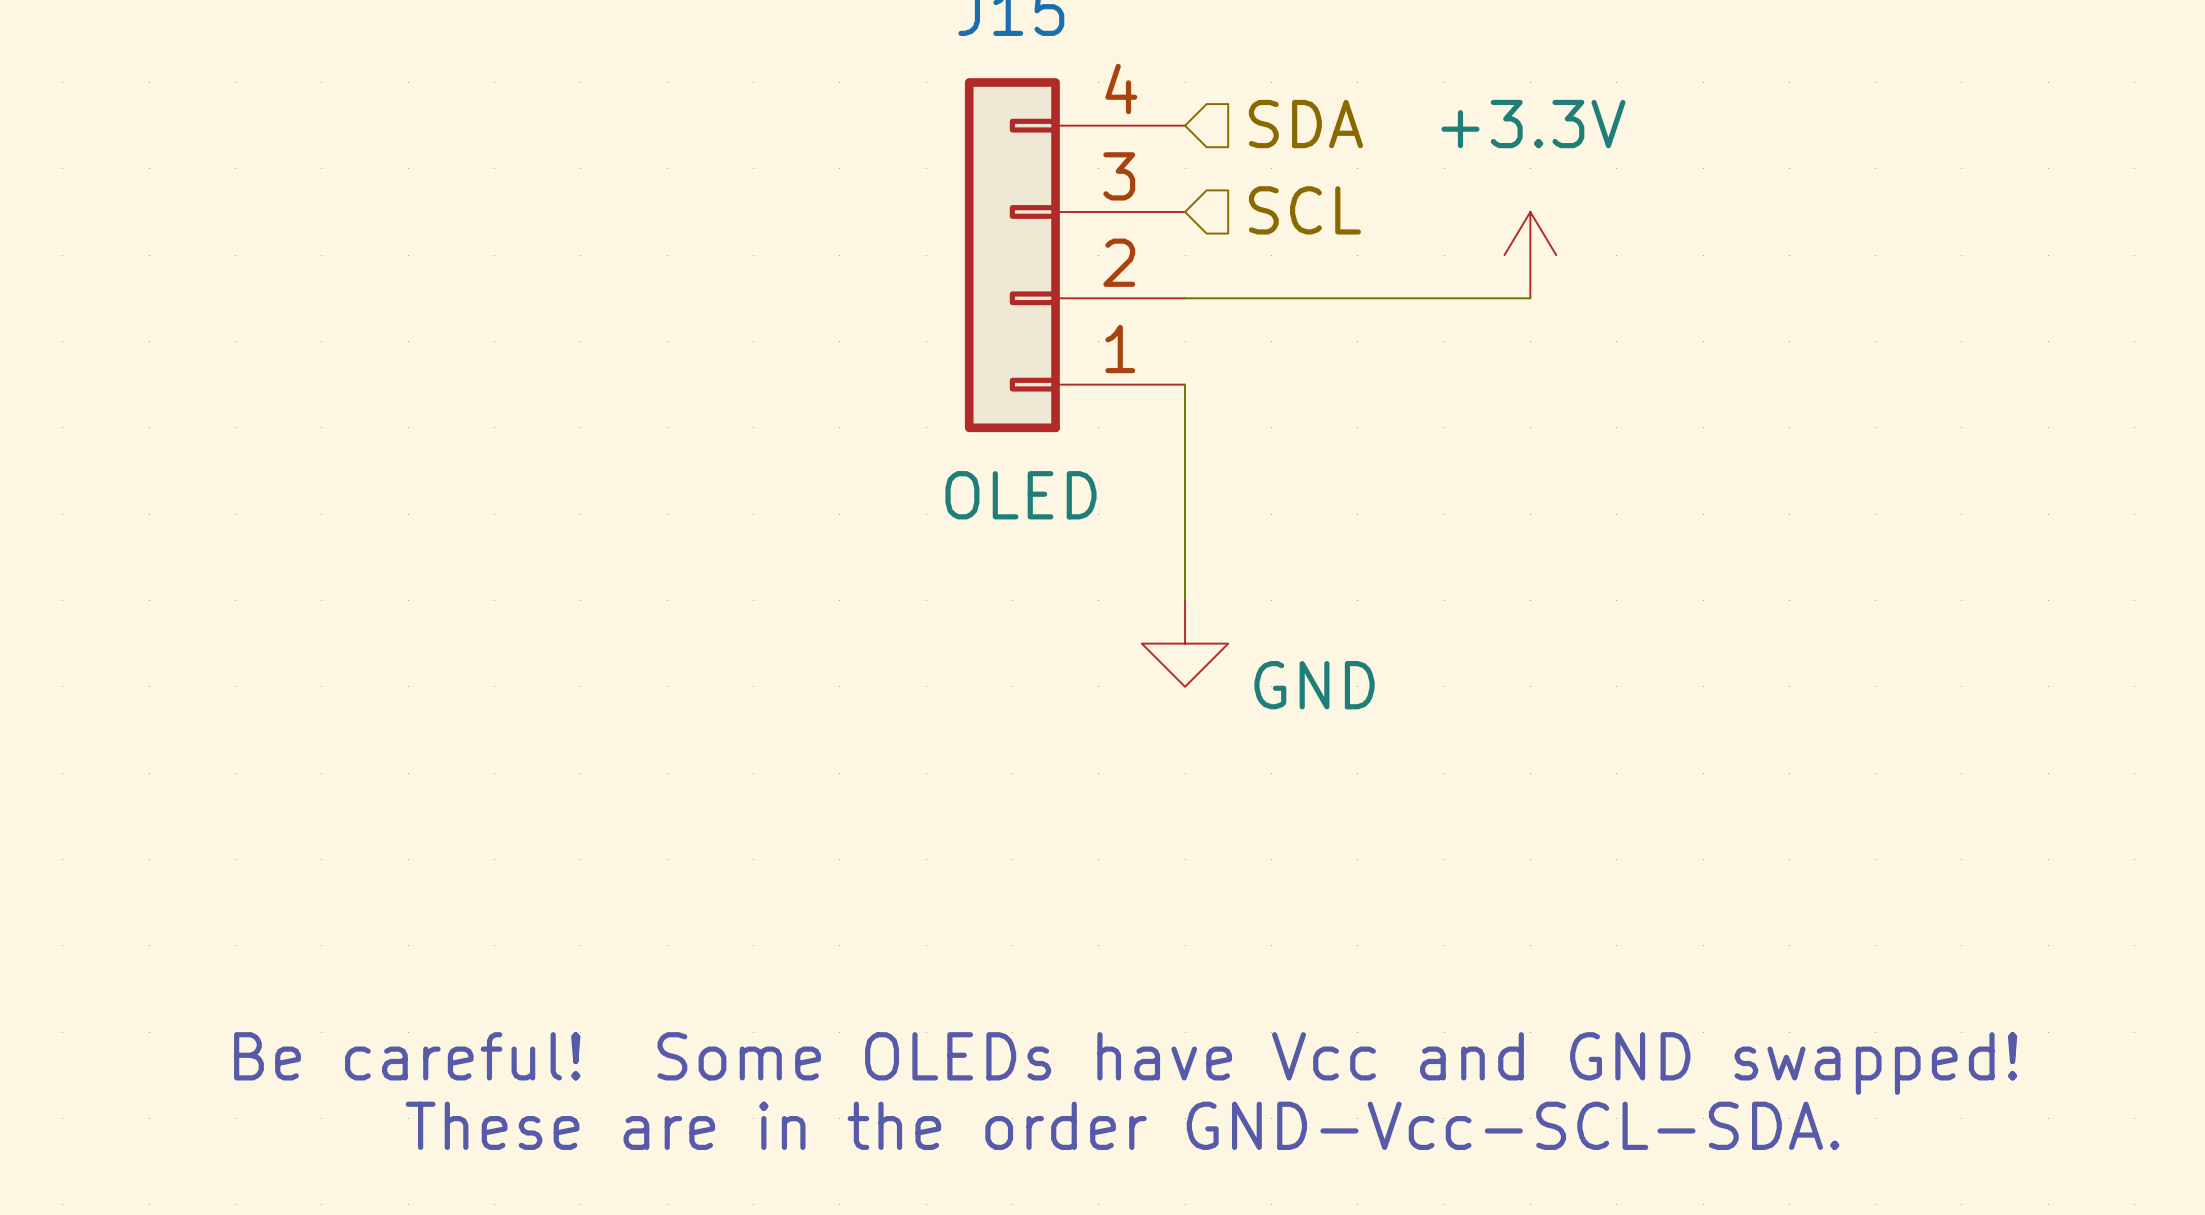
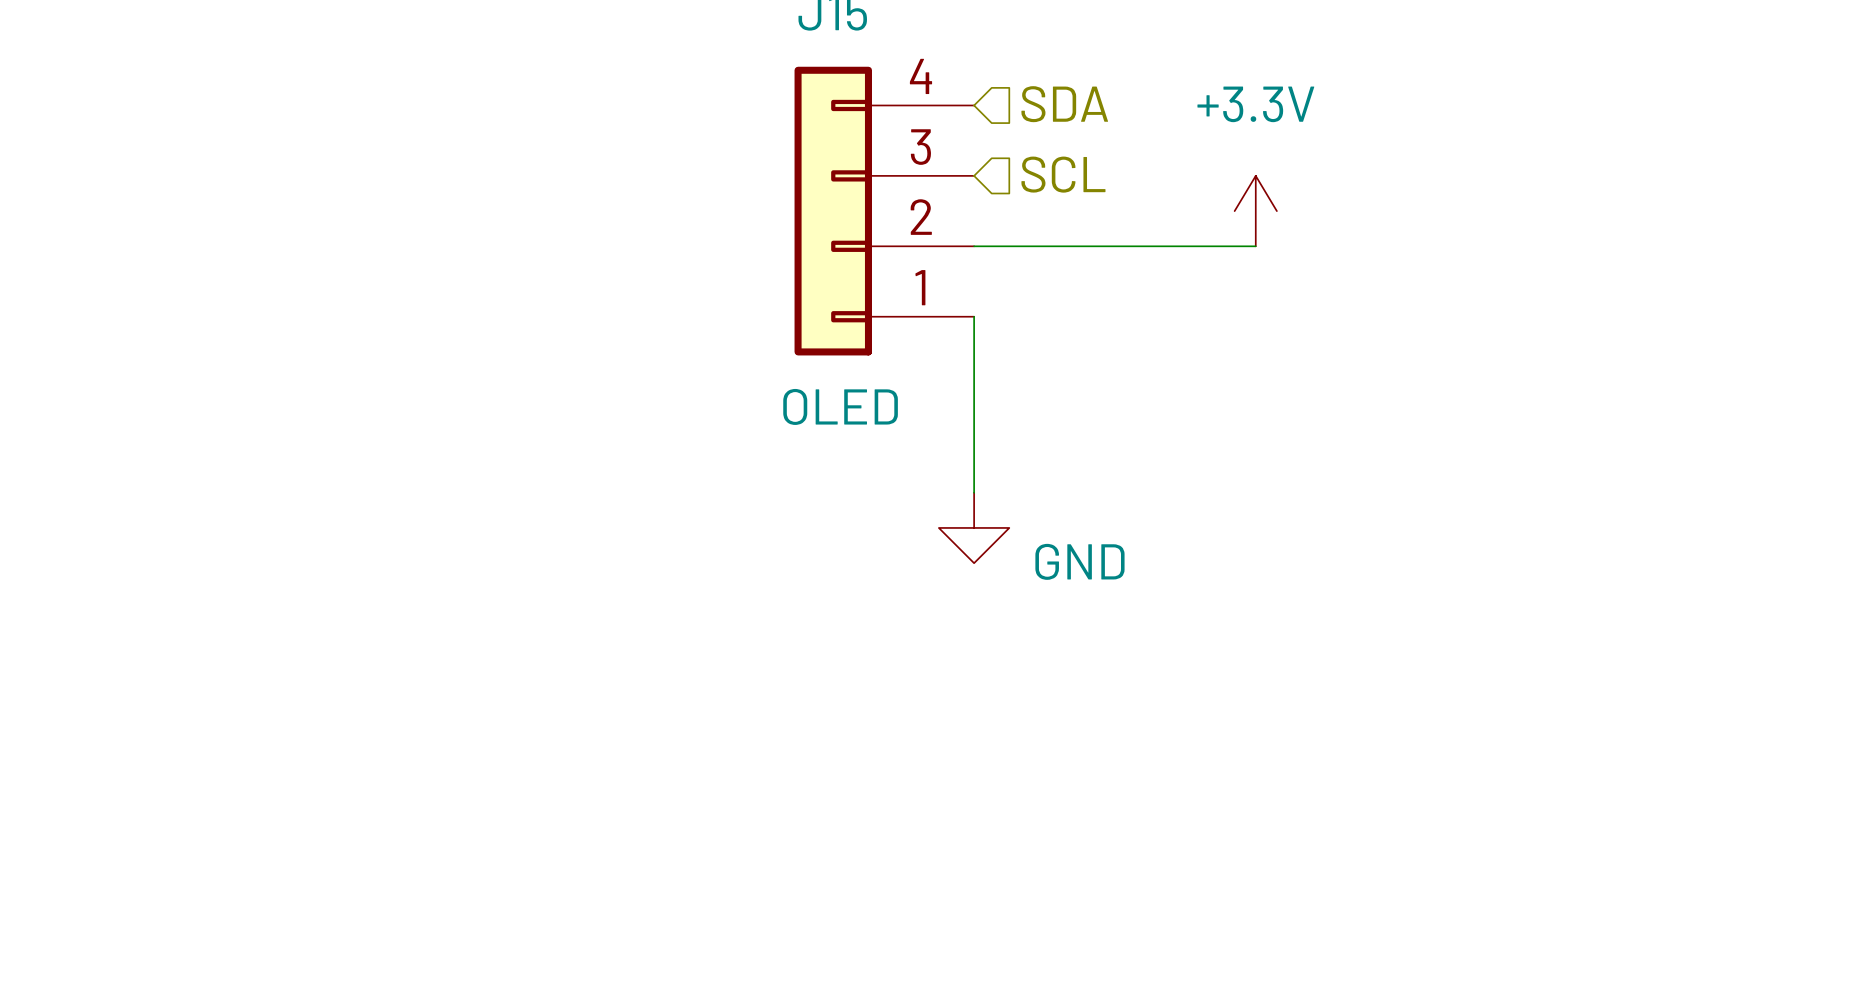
text: Be careful! Some OLEDs have Vcc and GND swapped! (1125, 1063) -> none
text: These are in the order GND-Vcc-SCL-SDA. (1122, 1125) -> none

